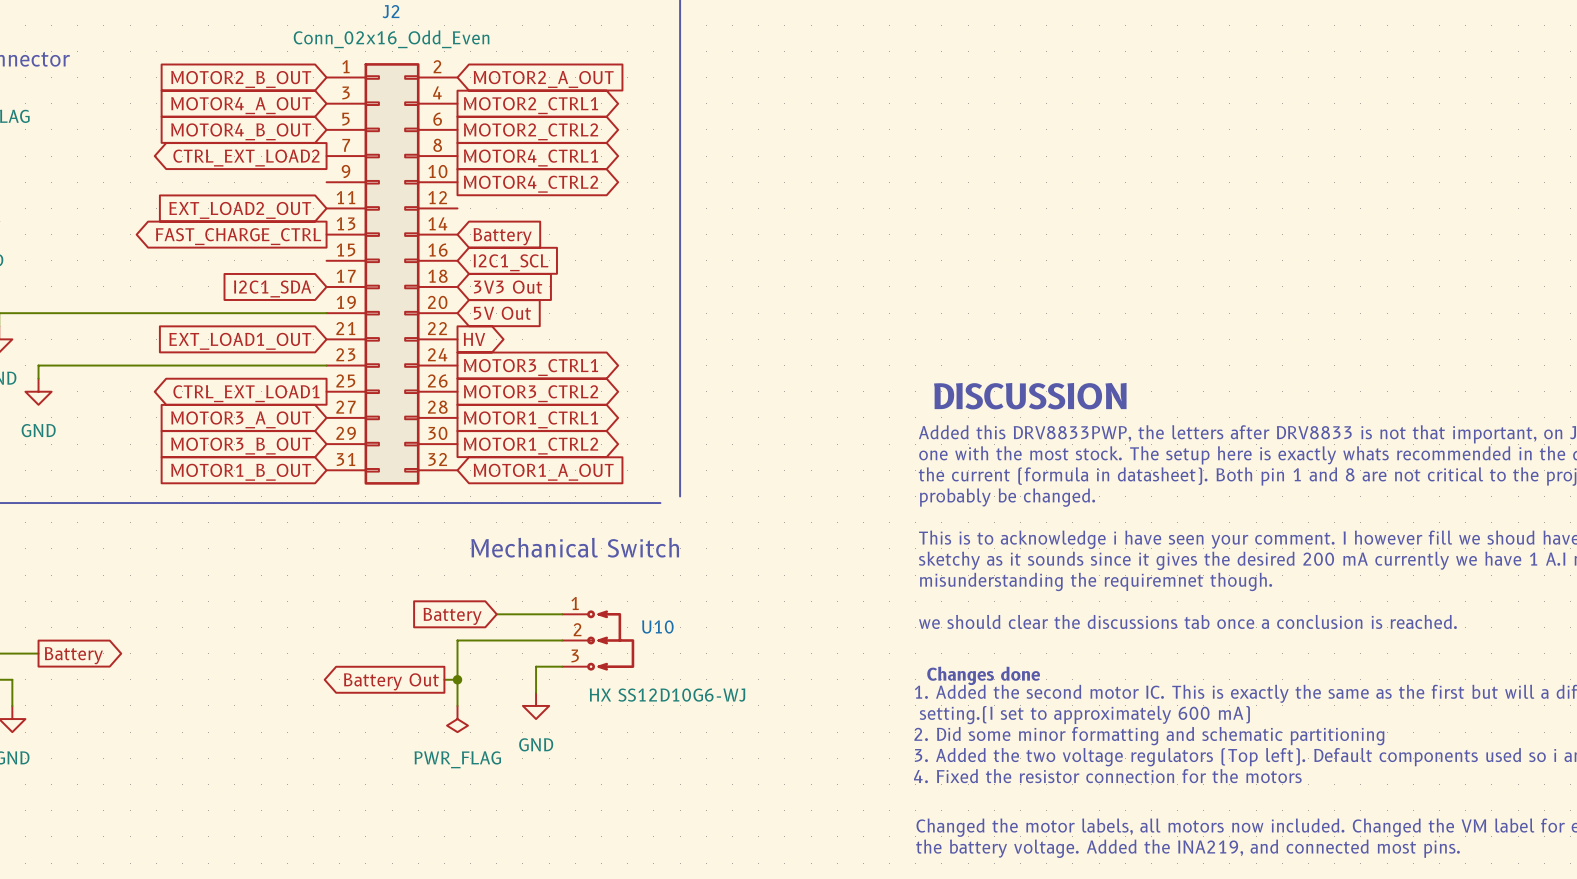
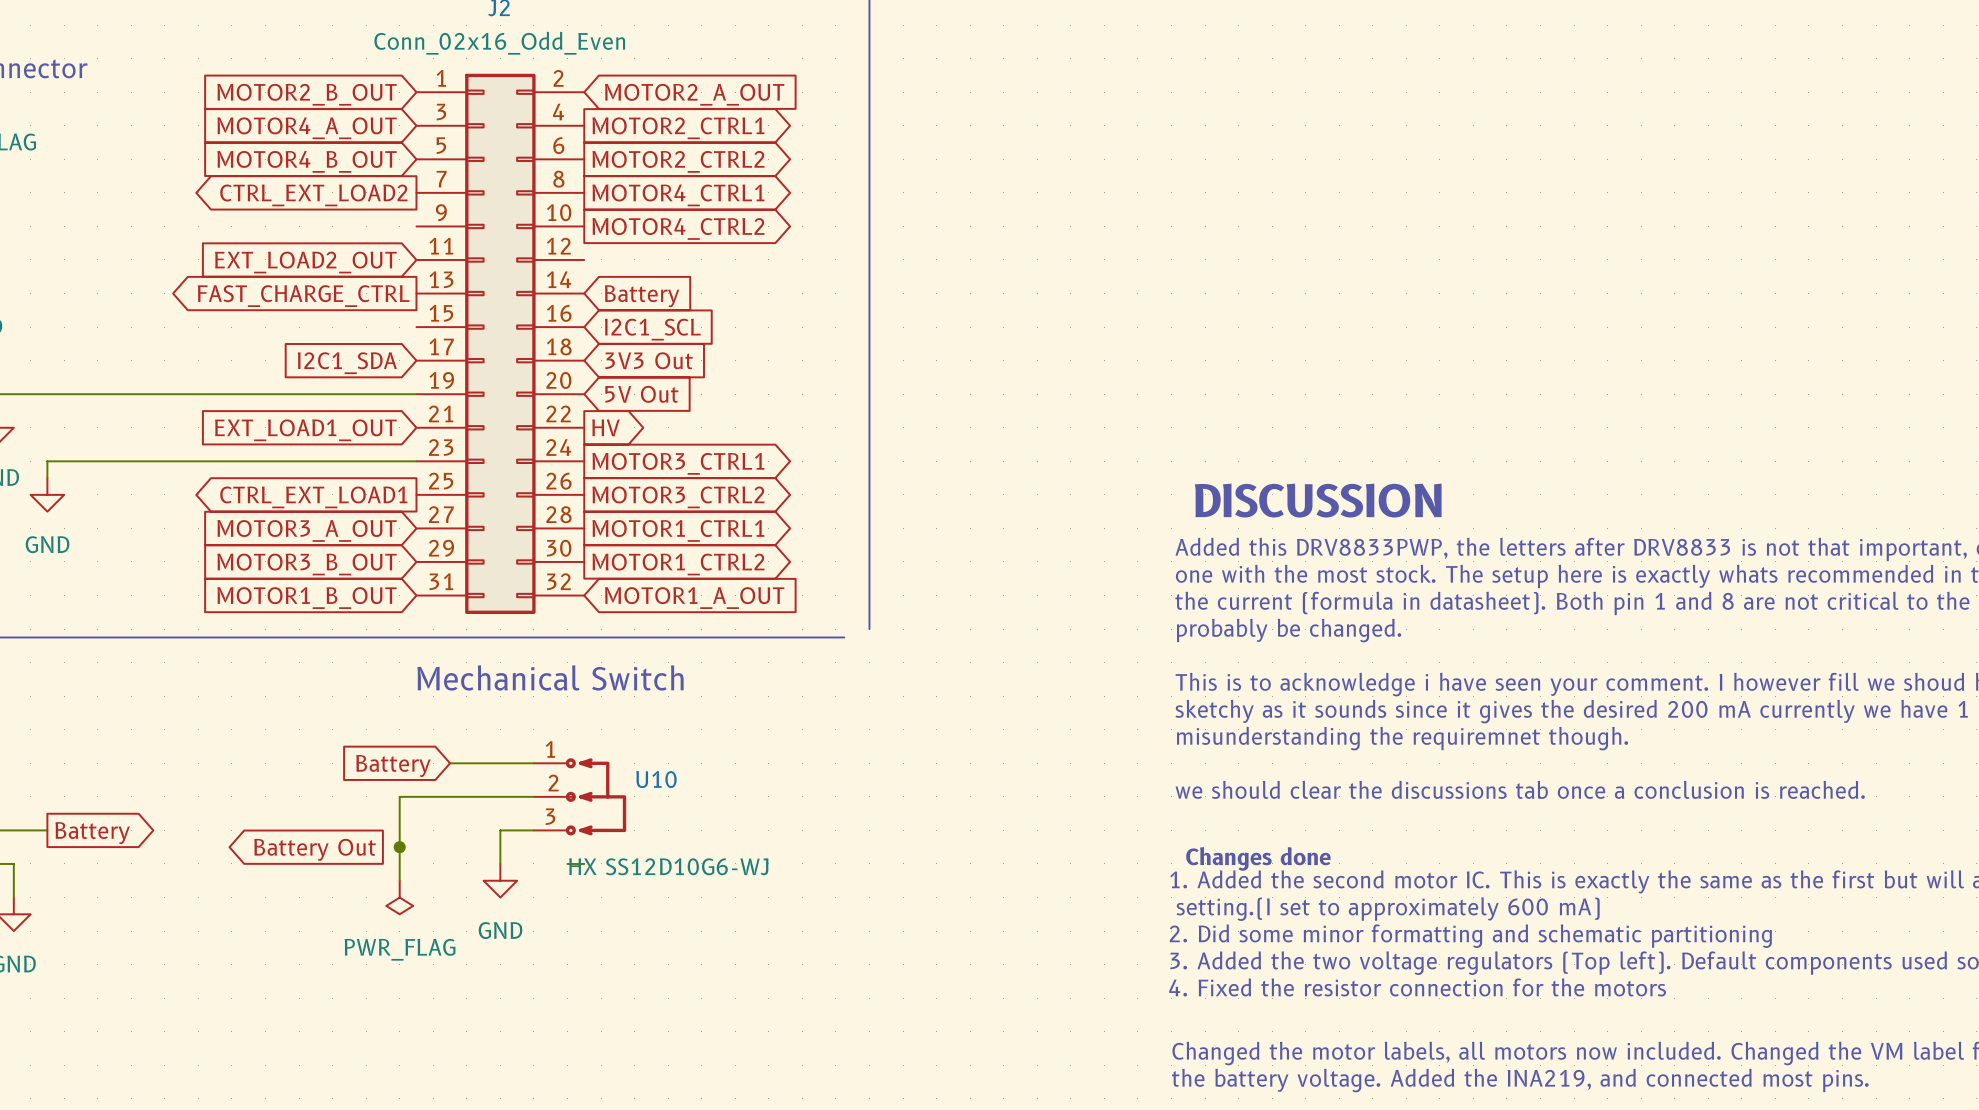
text position: Mechanical Switch (575, 547) -> Mechanical Switch (550, 677)
wire: (496, 614) (562, 614) -> (450, 763) (533, 763)
global label position: Battery (452, 616) -> Battery (393, 766)
wire: (562, 640) (457, 640) (457, 705) -> (533, 796) (399, 796) (399, 880)
U10 position: (598, 640) -> (580, 796)
junction: none -> (399, 847)
wire: (562, 666) (536, 666) (536, 692) -> (533, 830) (500, 830) (500, 863)
junction: (457, 679) -> none
global label position: Battery Out (391, 681) -> Battery Out (315, 849)
power symbol position: GND (536, 705) -> GND (500, 880)
power symbol position: PWR_FLAG (457, 719) -> PWR_FLAG (399, 897)

